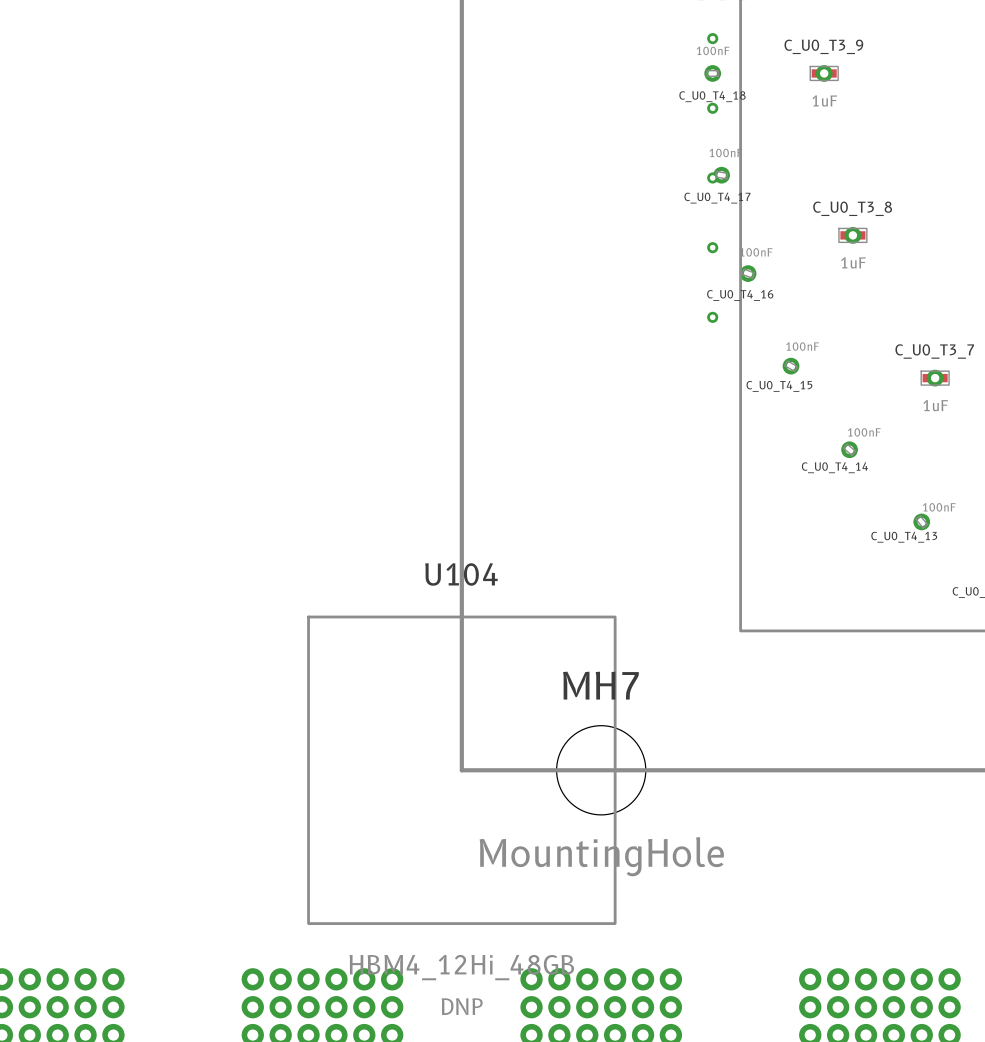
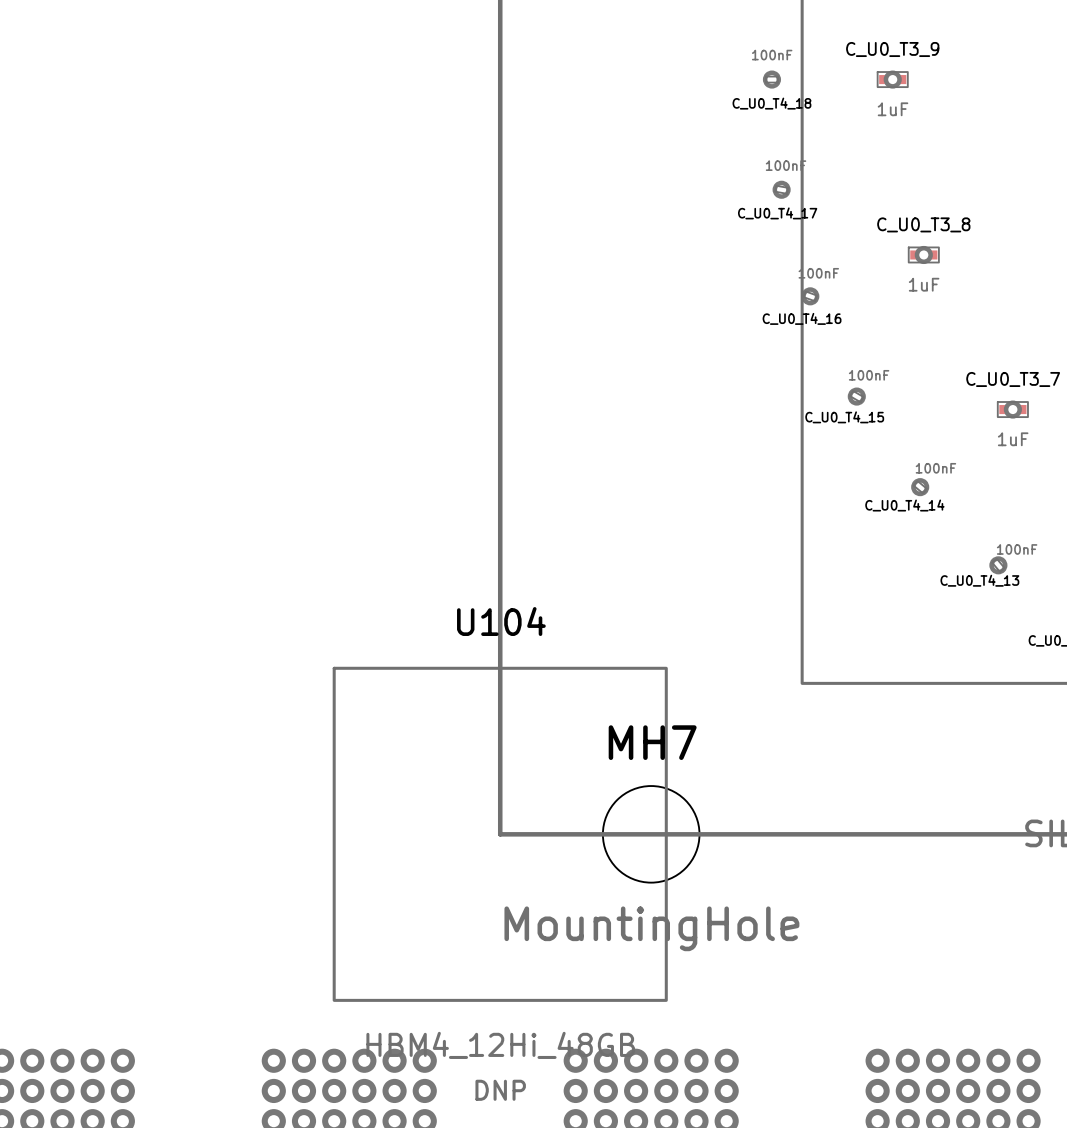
via: (712, 38) -> none
via: (712, 108) -> none
via: (712, 177) -> none
via: (712, 247) -> none
via: (712, 317) -> none

